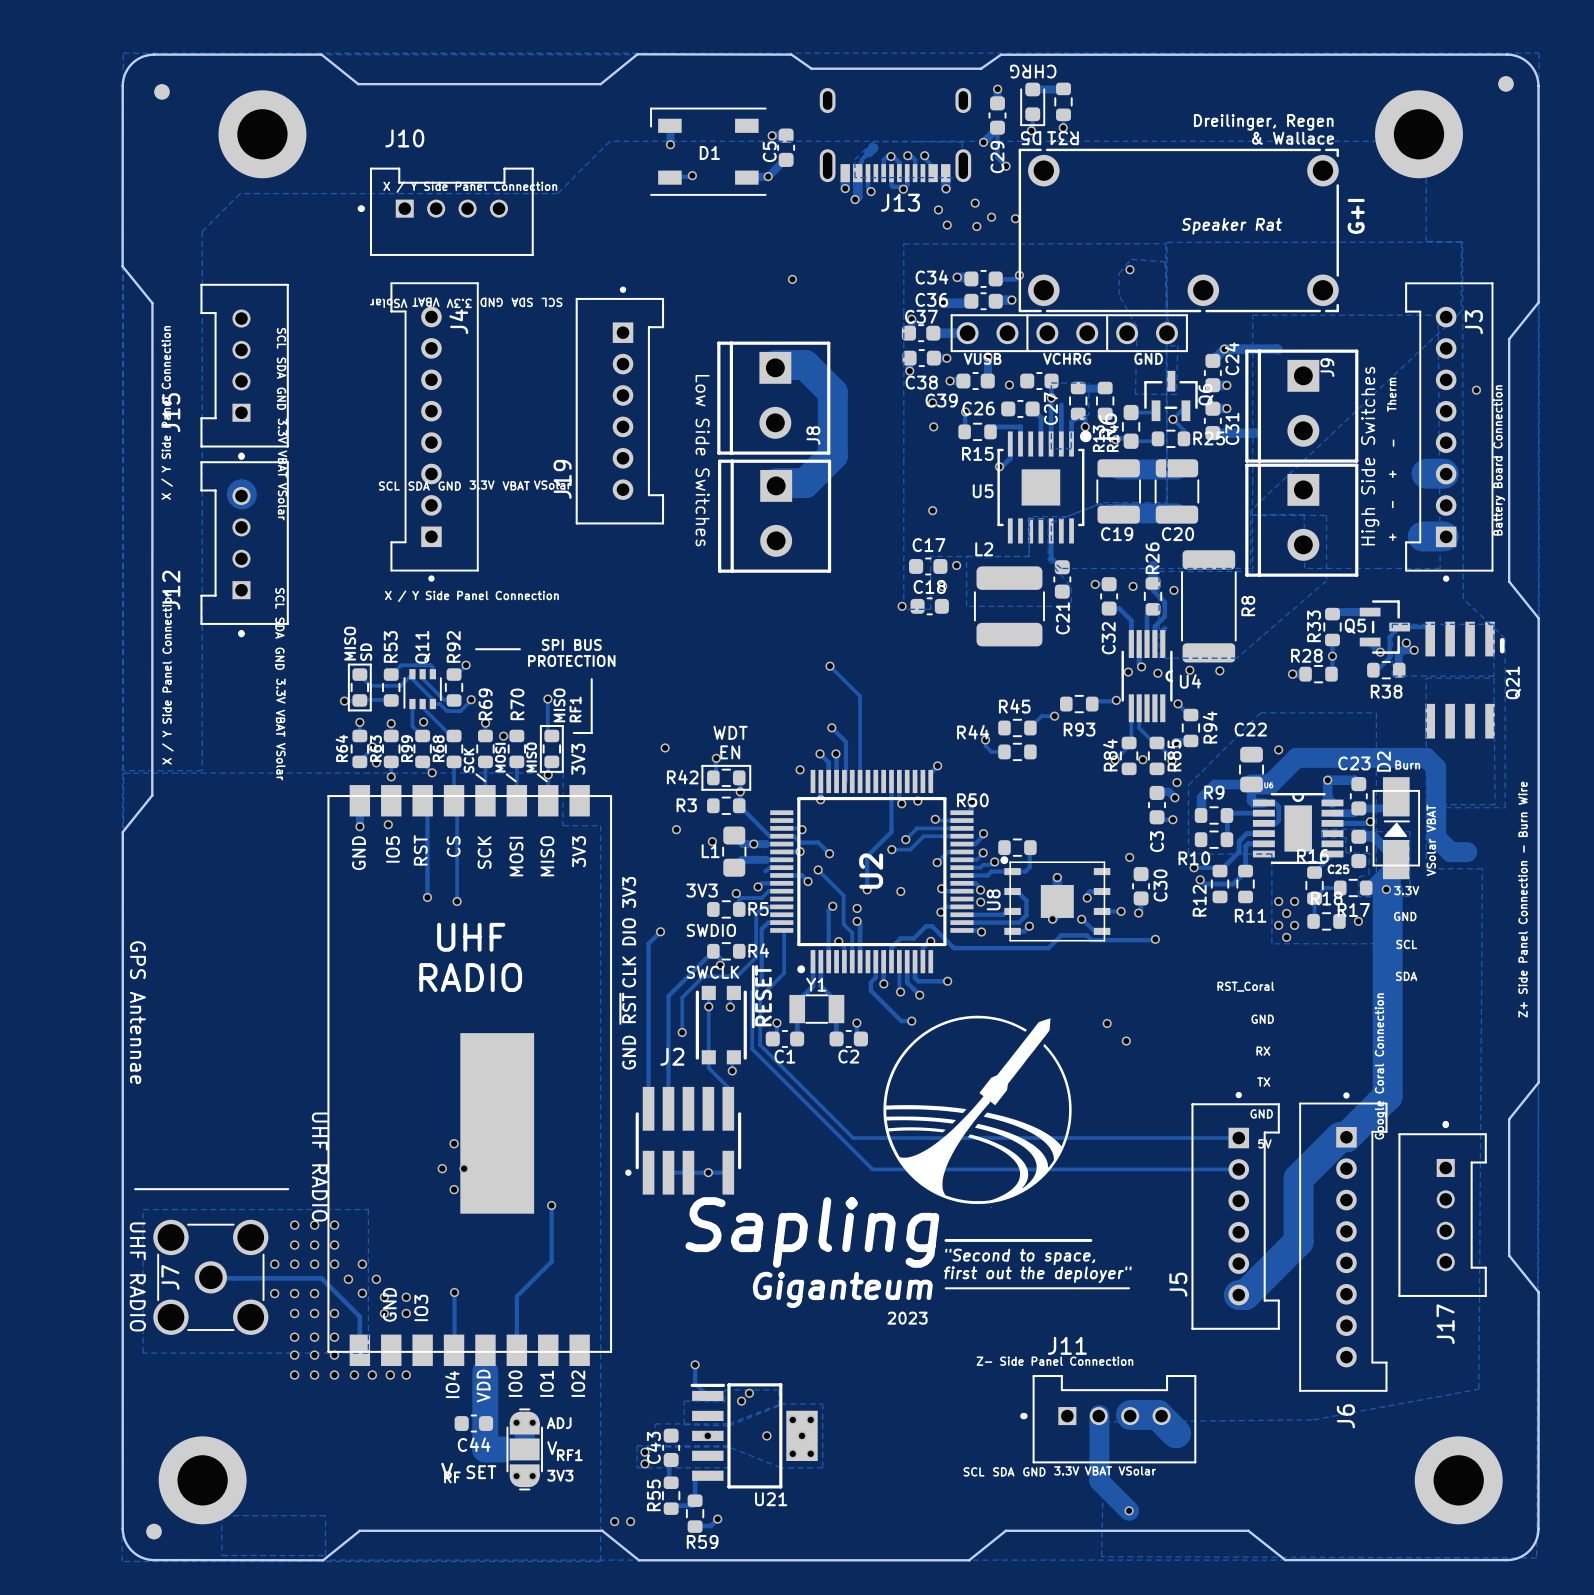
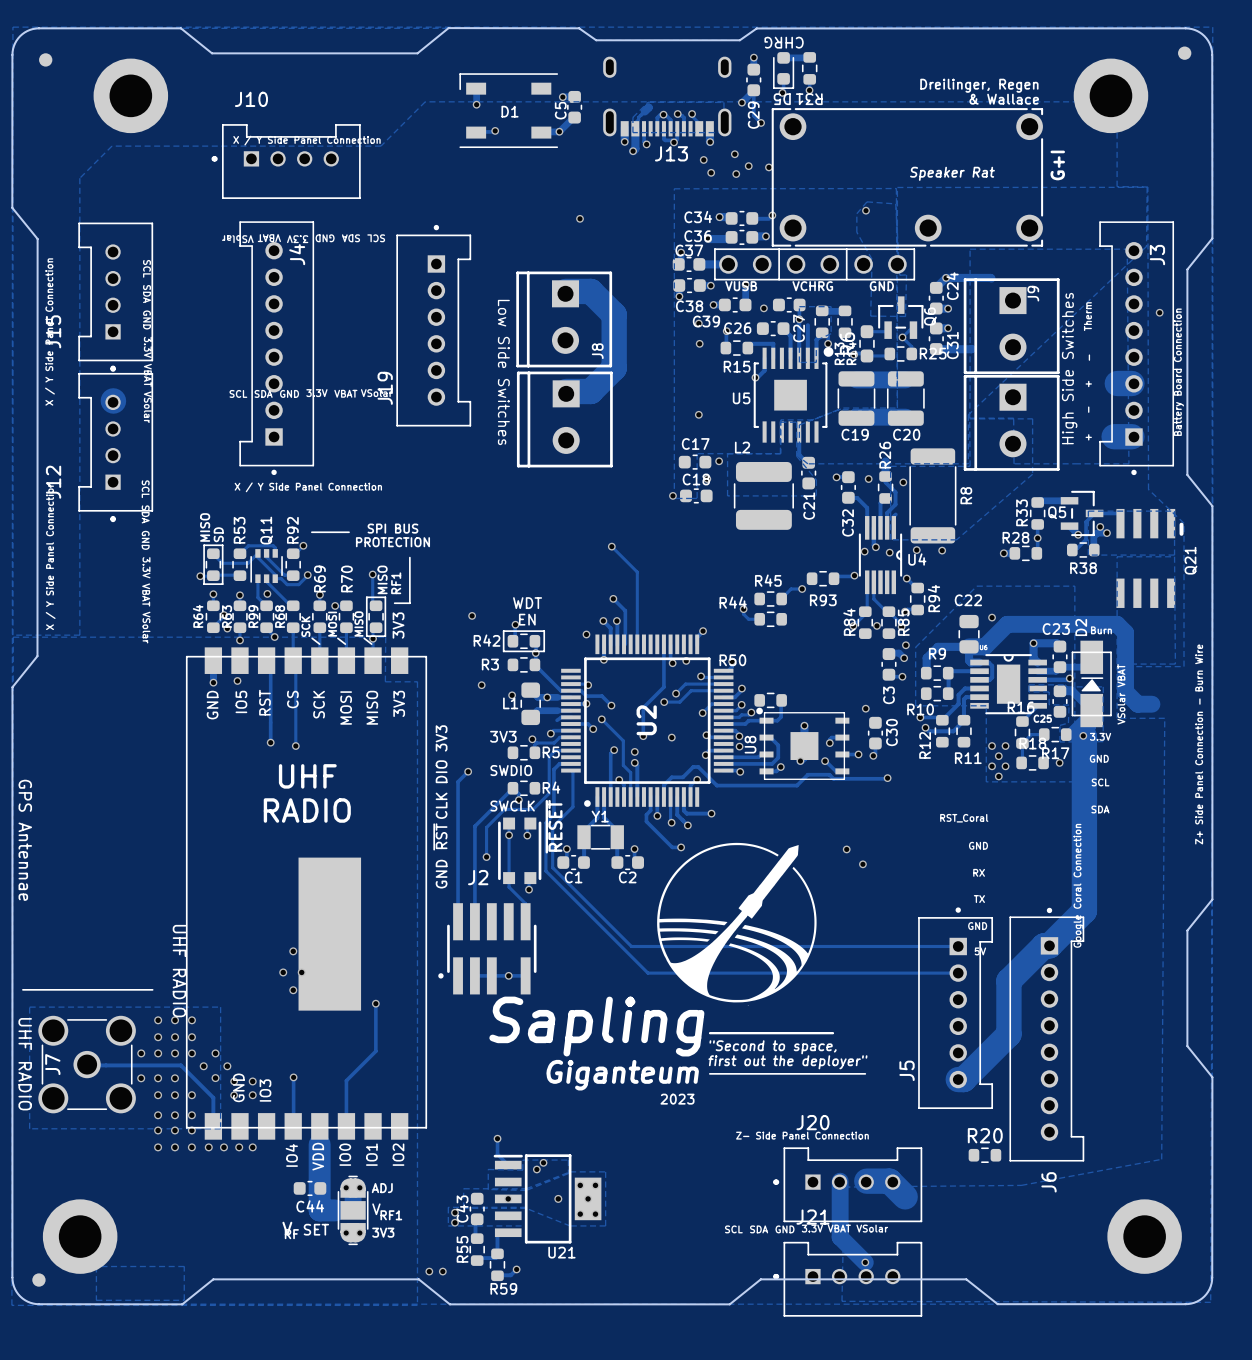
J17: (1442, 1208) -> none
J11 name: J11 (1067, 1345) -> J20 (812, 1122)
R20: none -> (984, 1155)
J21: none -> (847, 1279)

